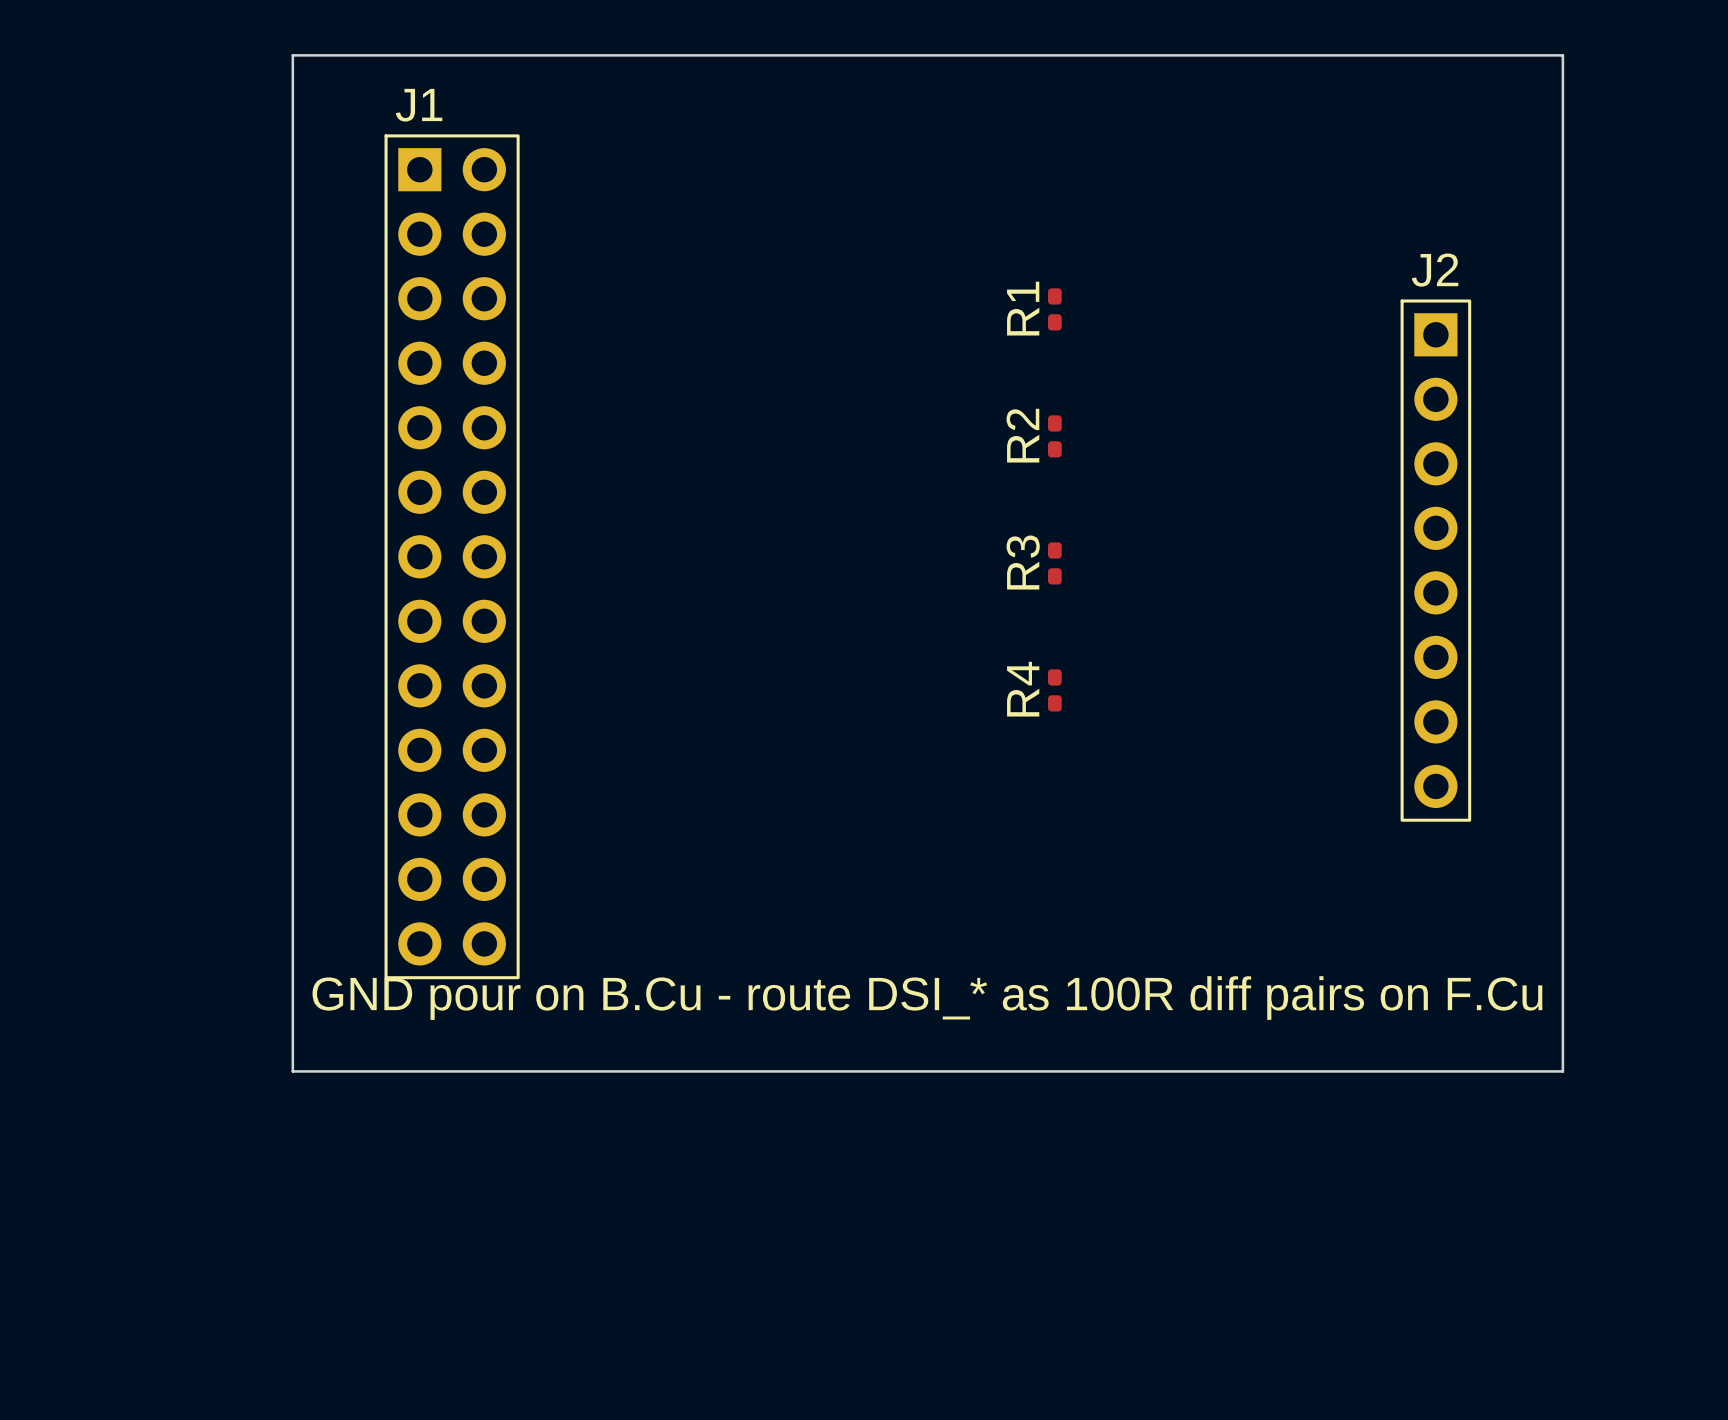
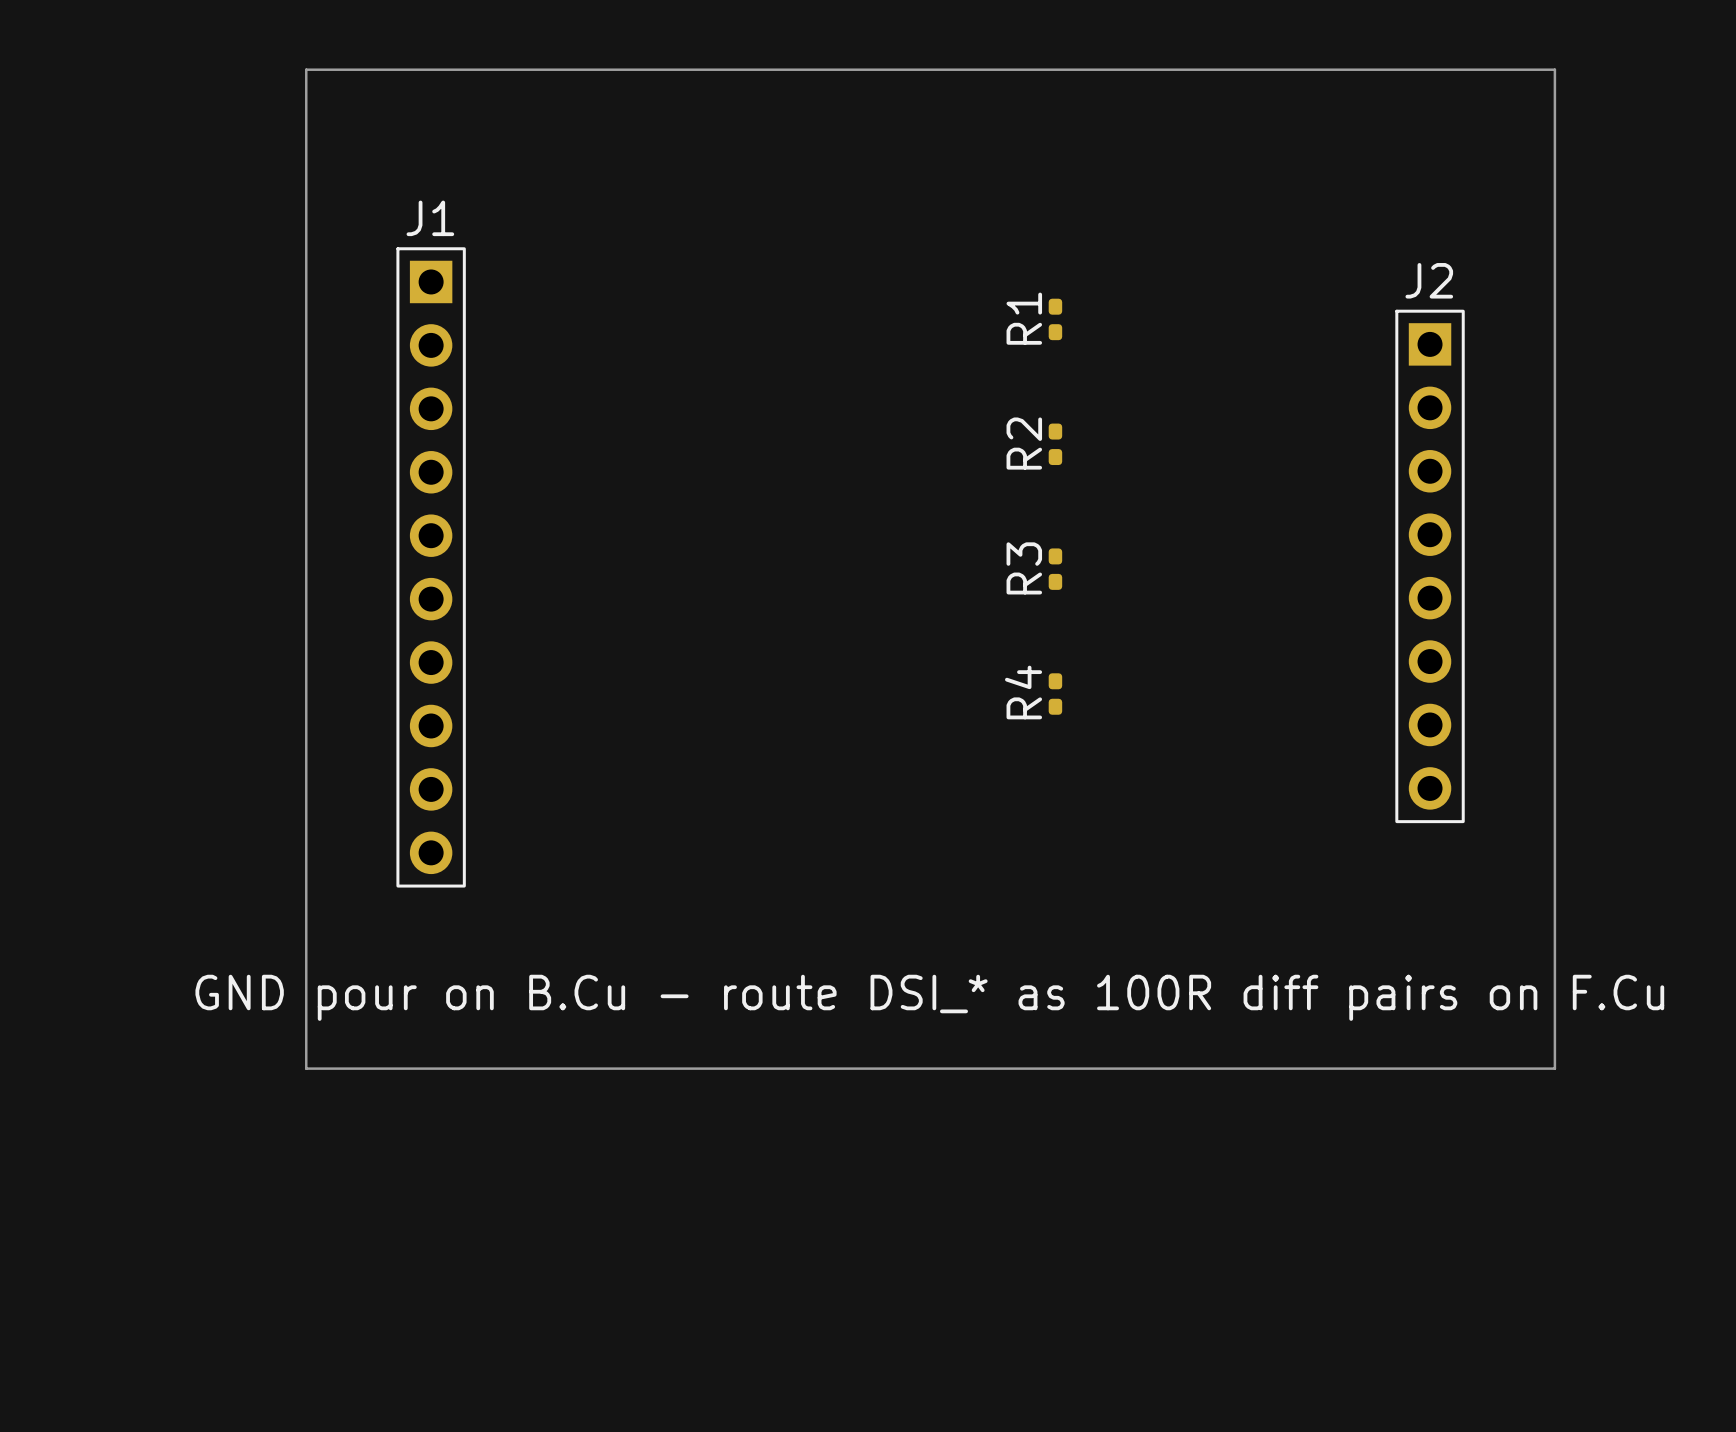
J1 name position: J1 (419, 105) -> J1 (430, 218)
J1 footprint: [384, 134, 520, 980] -> [396, 247, 466, 888]

